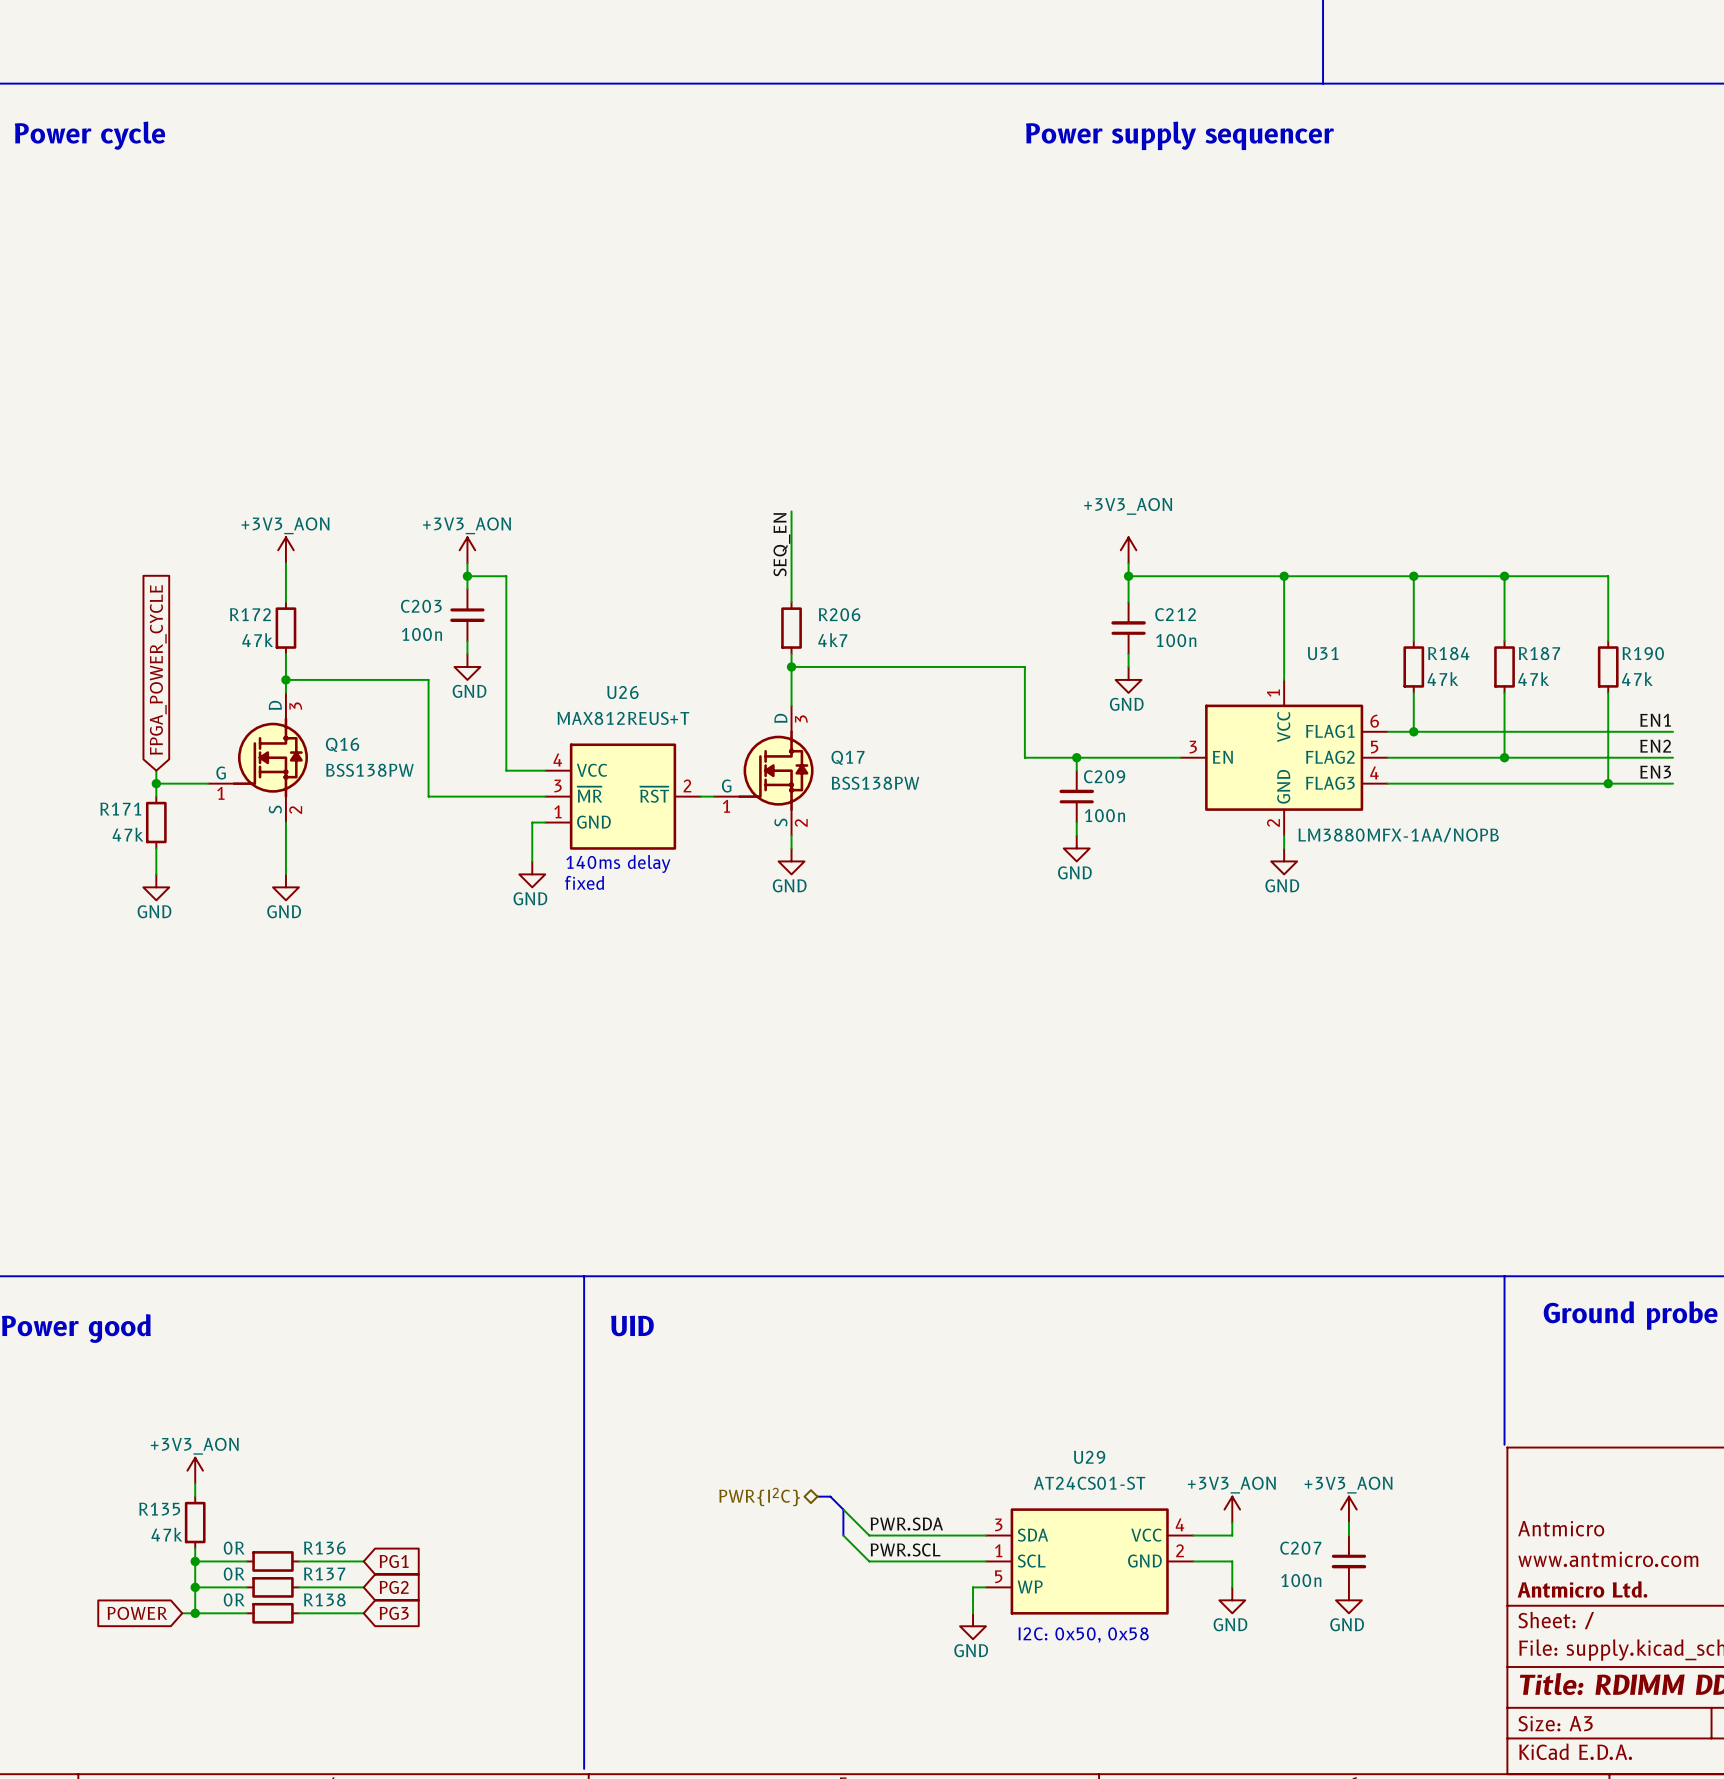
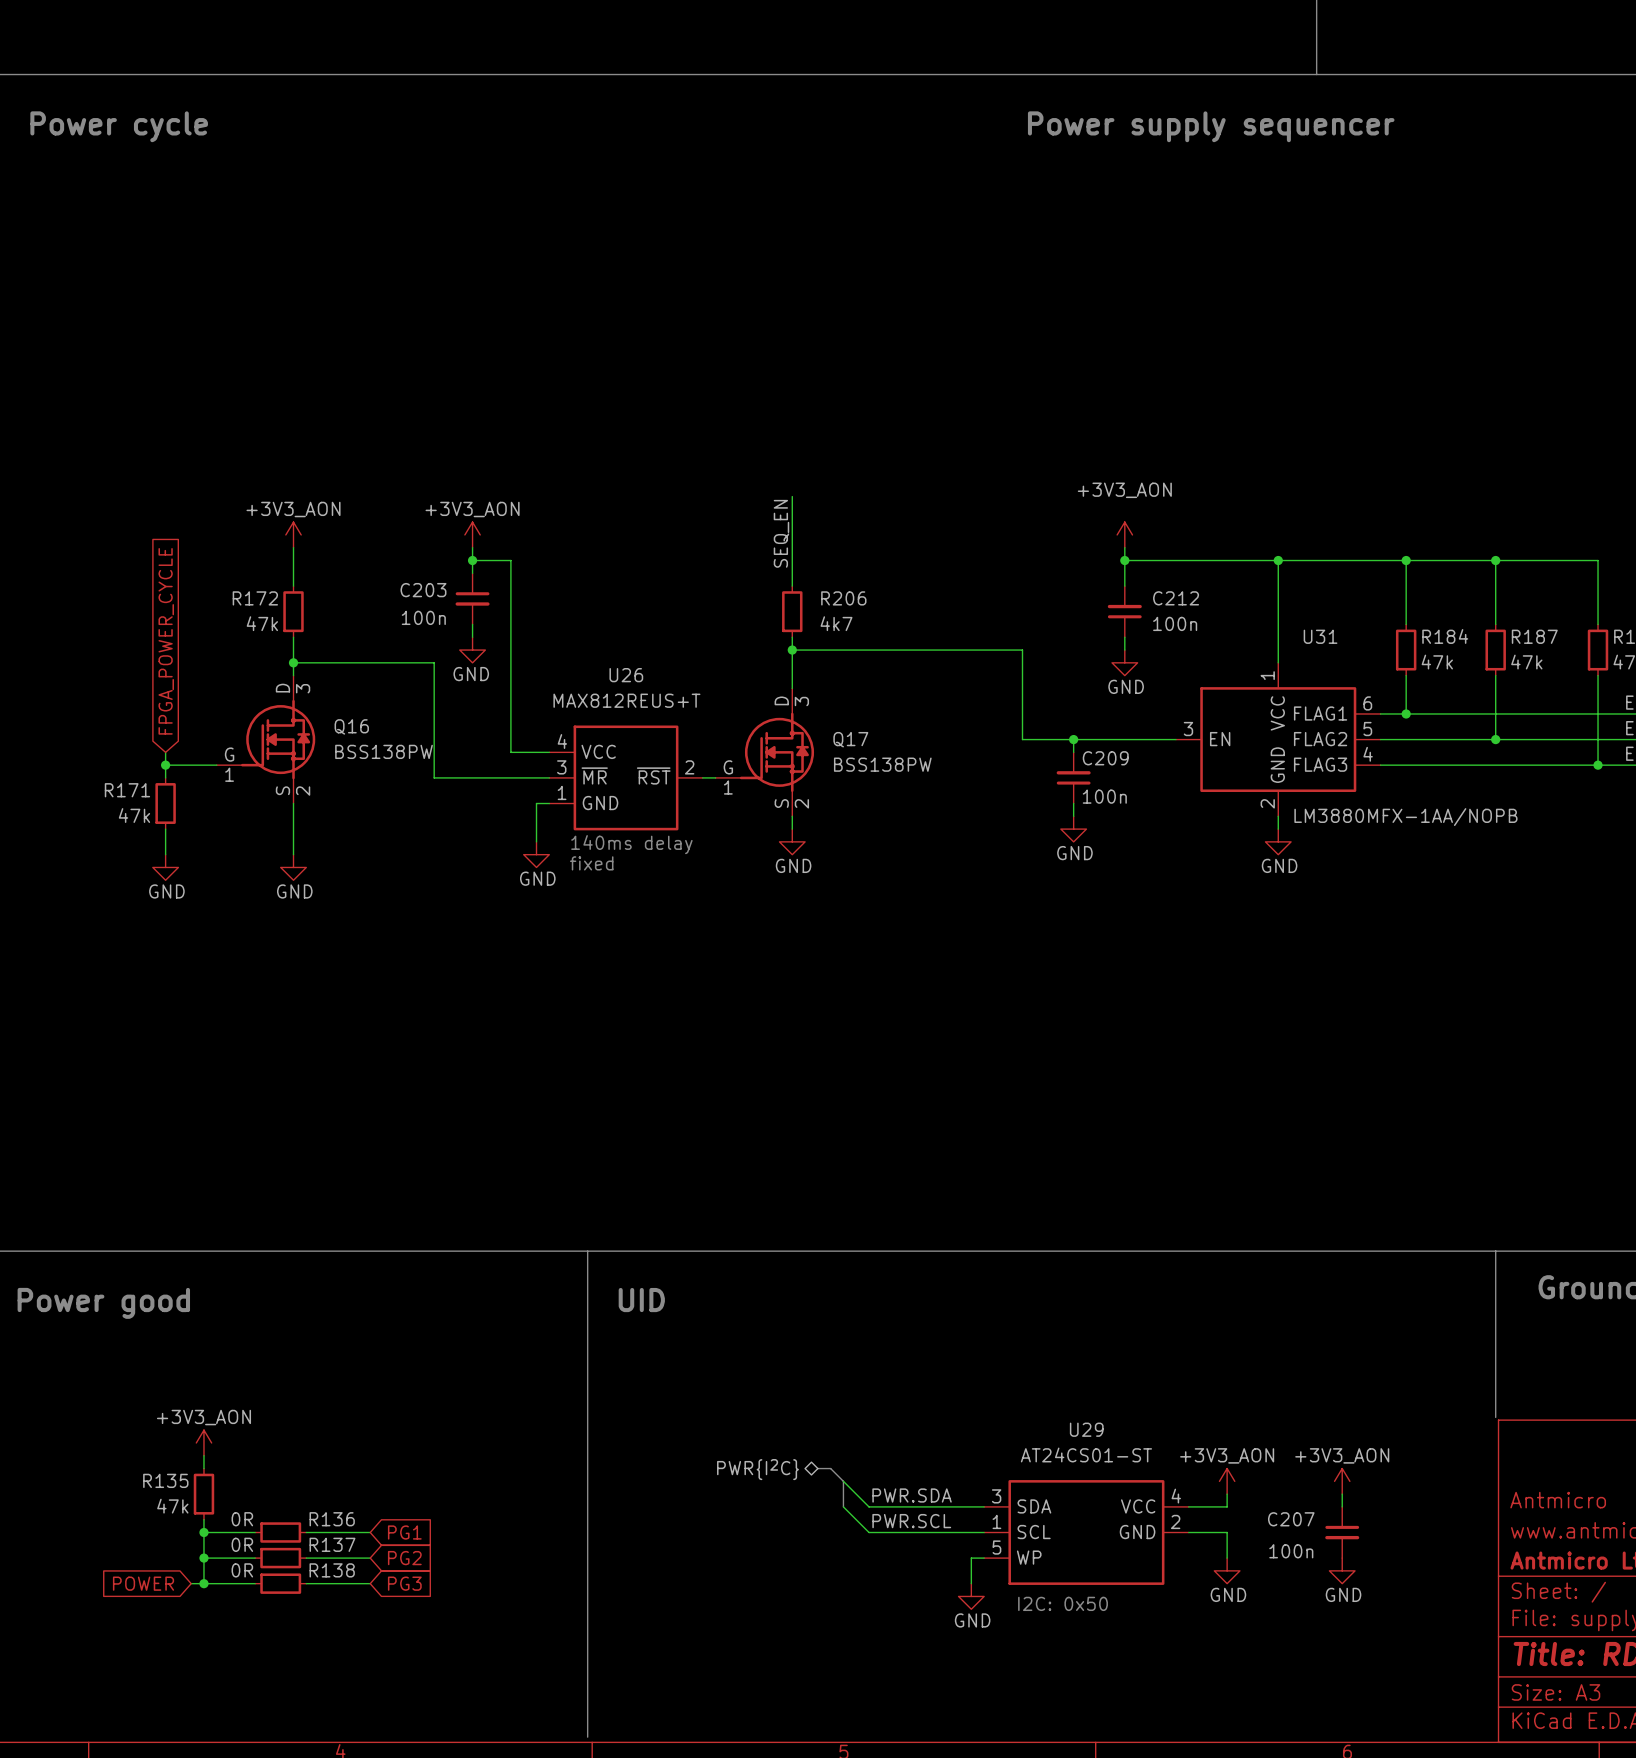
text: I2C: 0x50, 0x58 (1083, 1635) -> I2C: 0x50 (1063, 1603)

